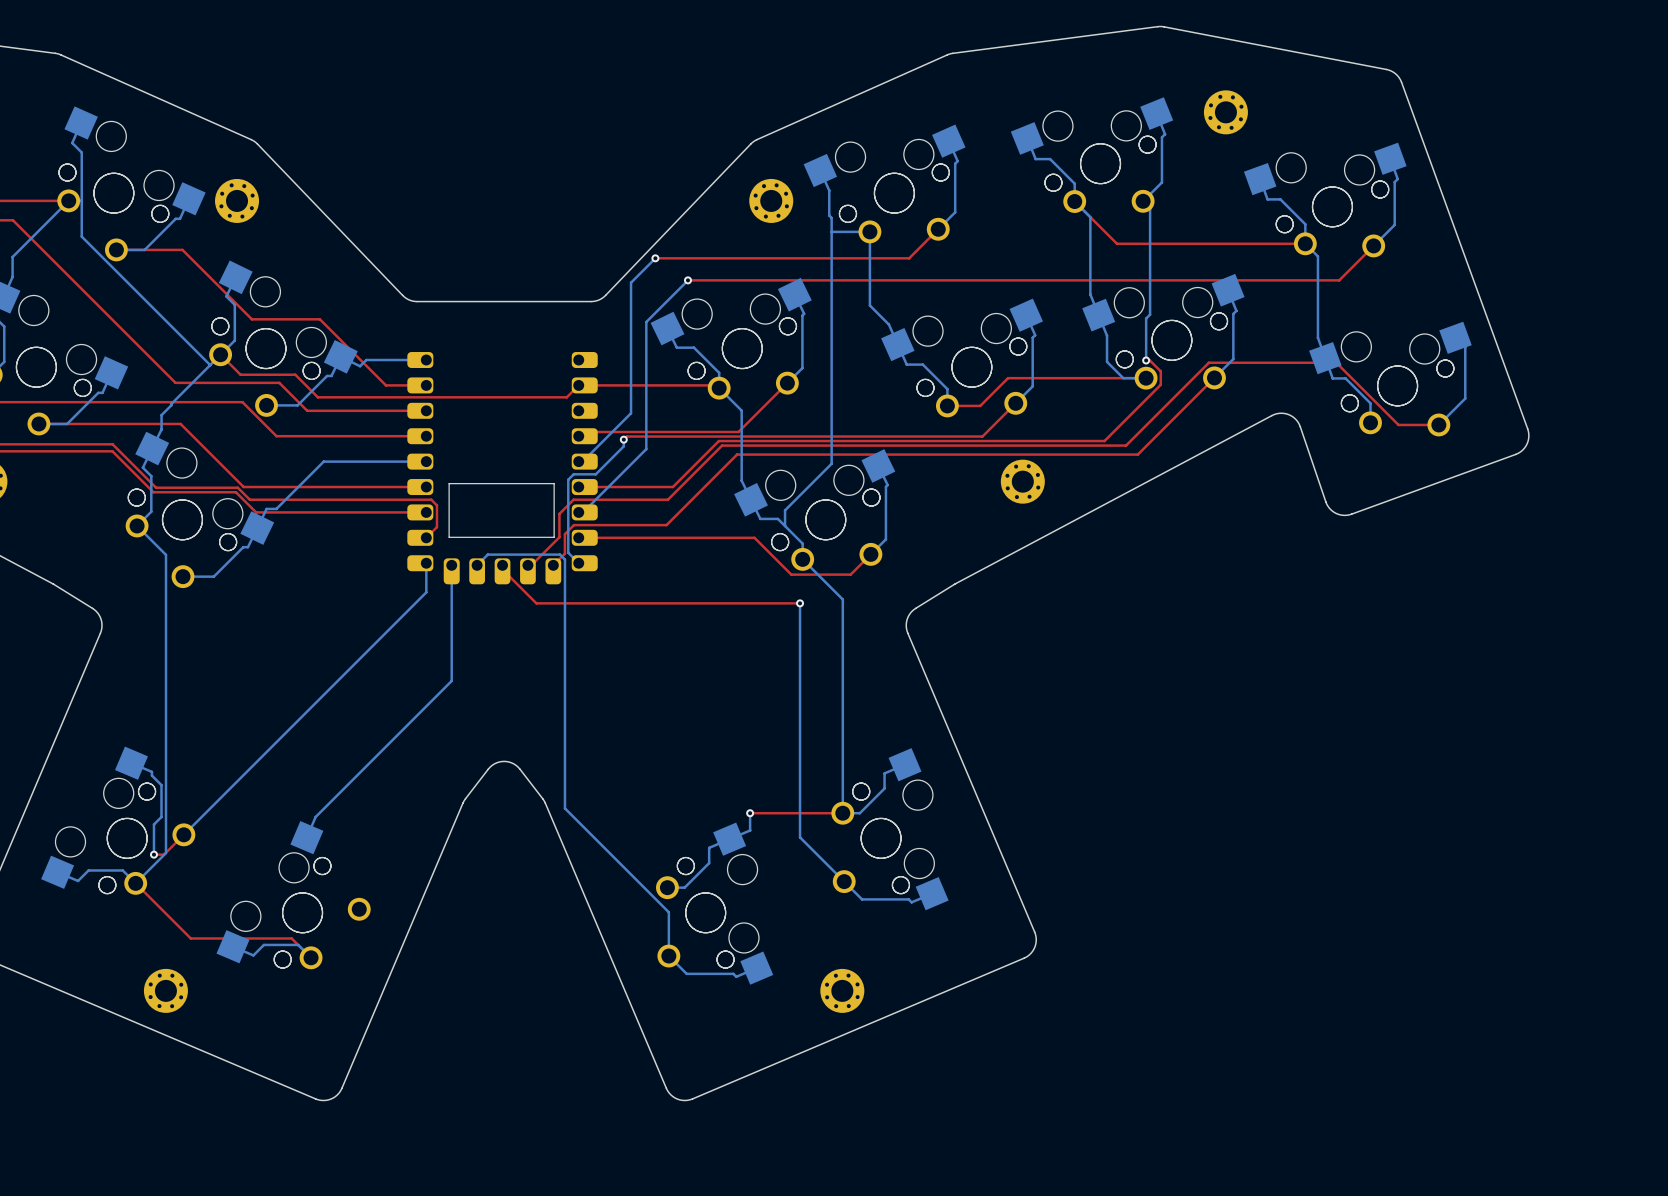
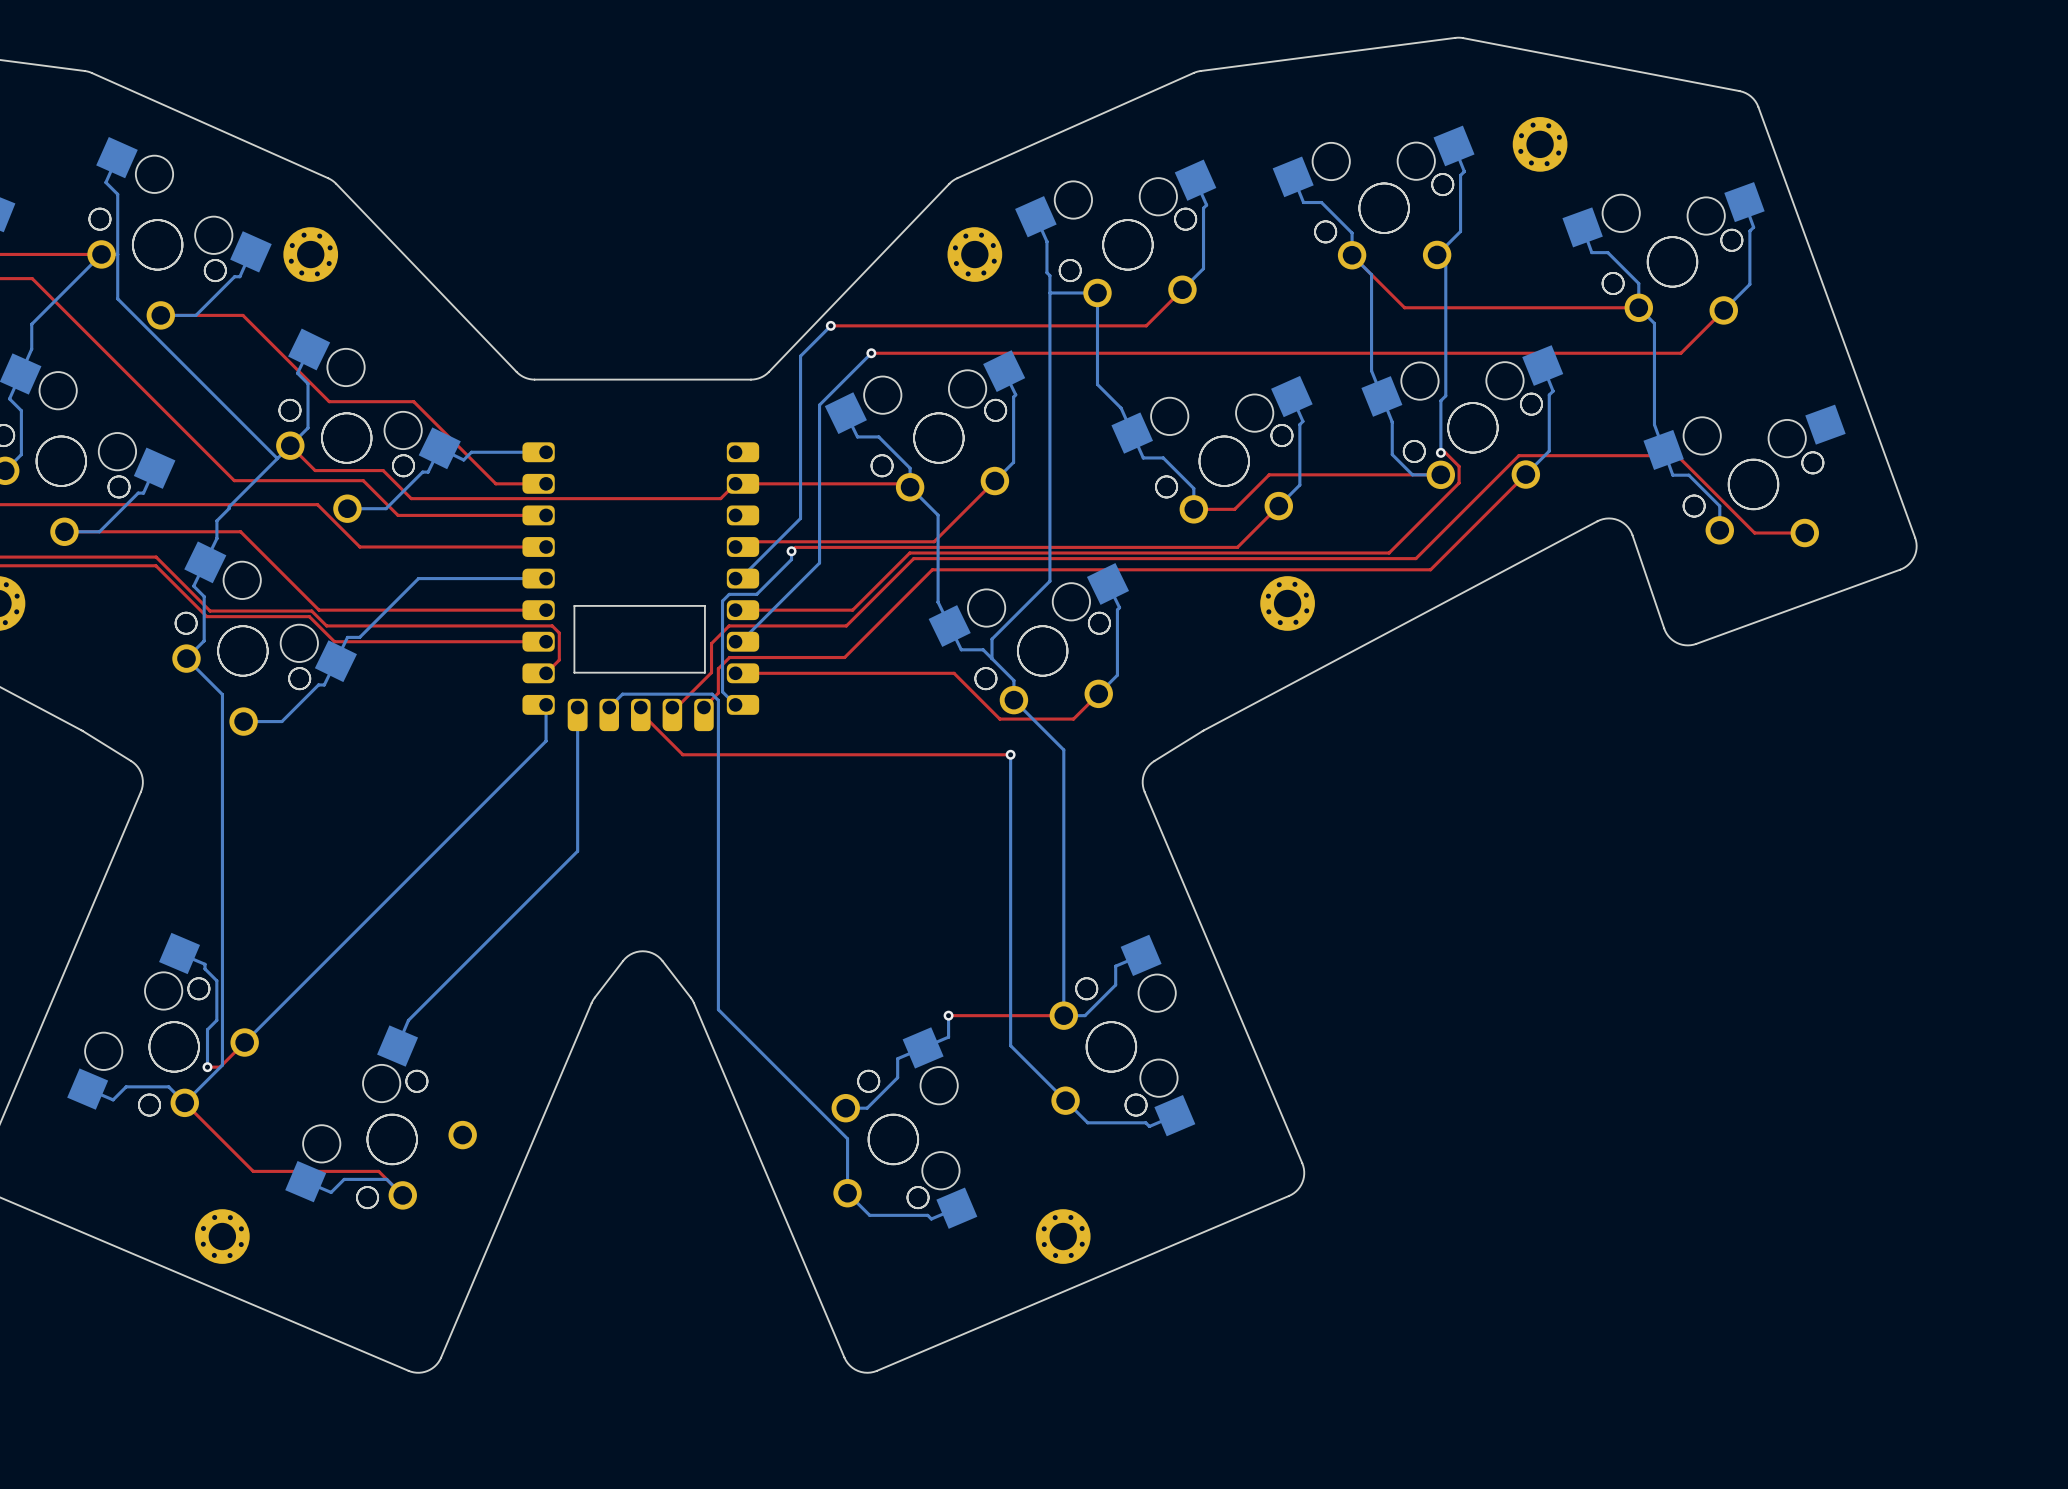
bottom track: (1455, 337) (1465, 347) (1465, 398) (1438, 424) -> none

